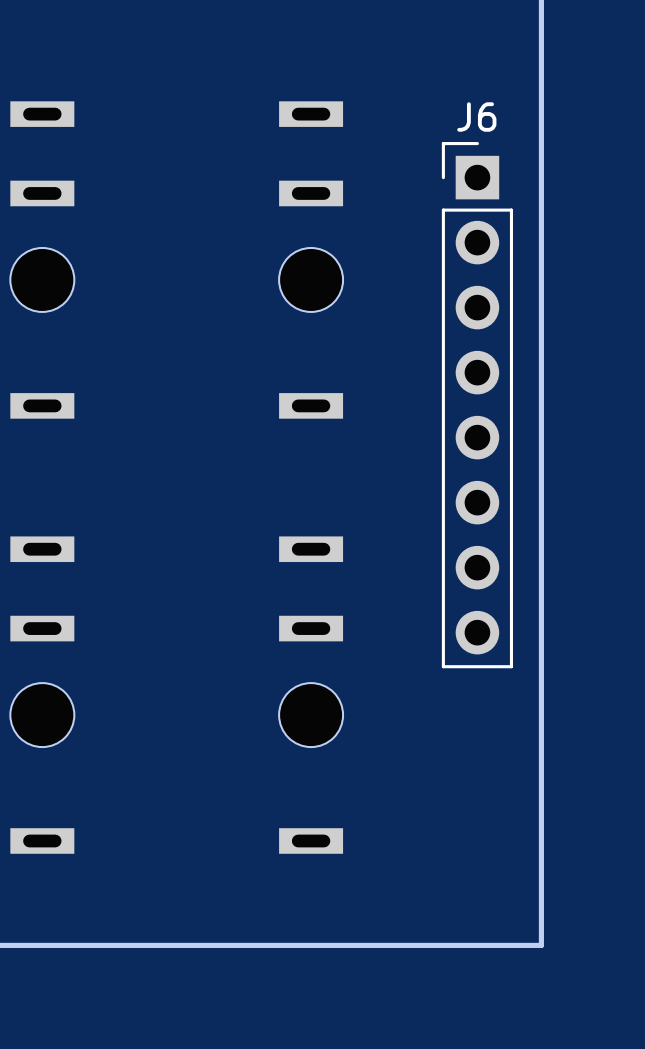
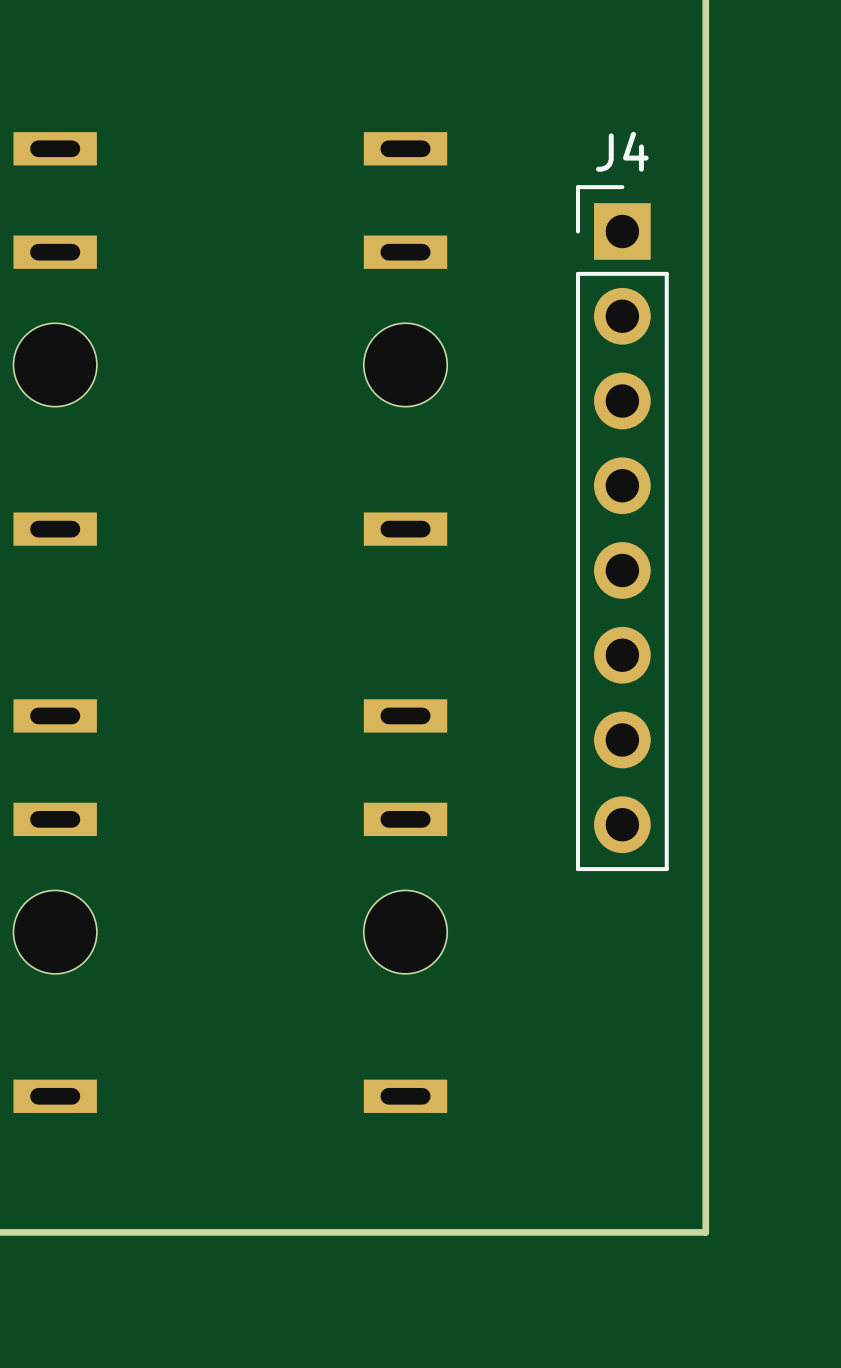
J6 name: J6 (476, 117) -> J4 (622, 151)

